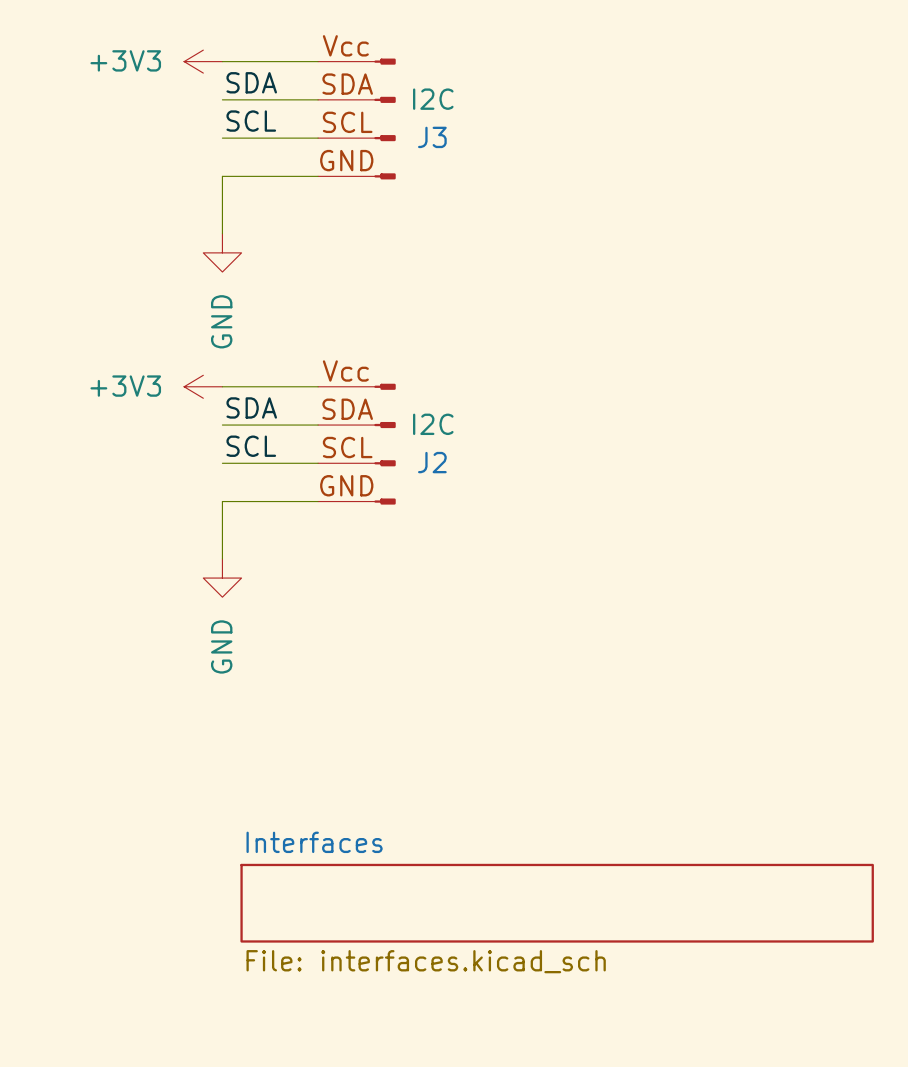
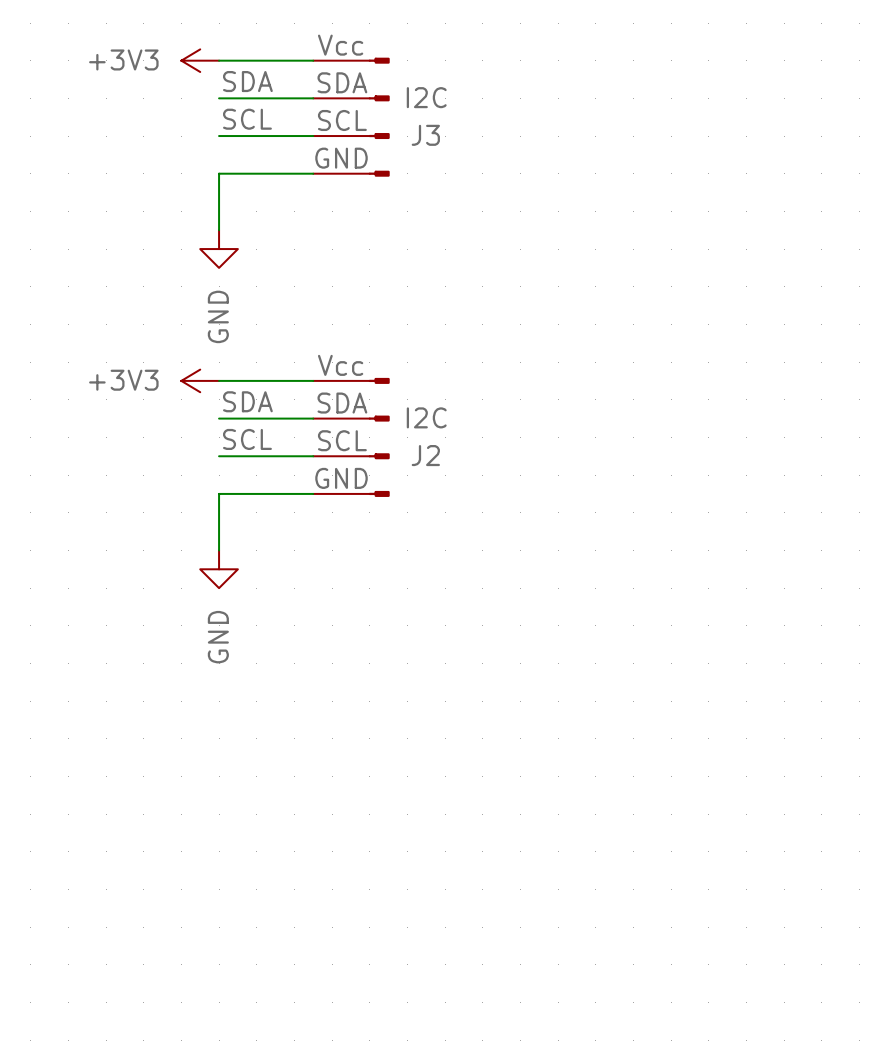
sheet Interfaces: File: interfaces.kicad_sch (557, 903) -> none

